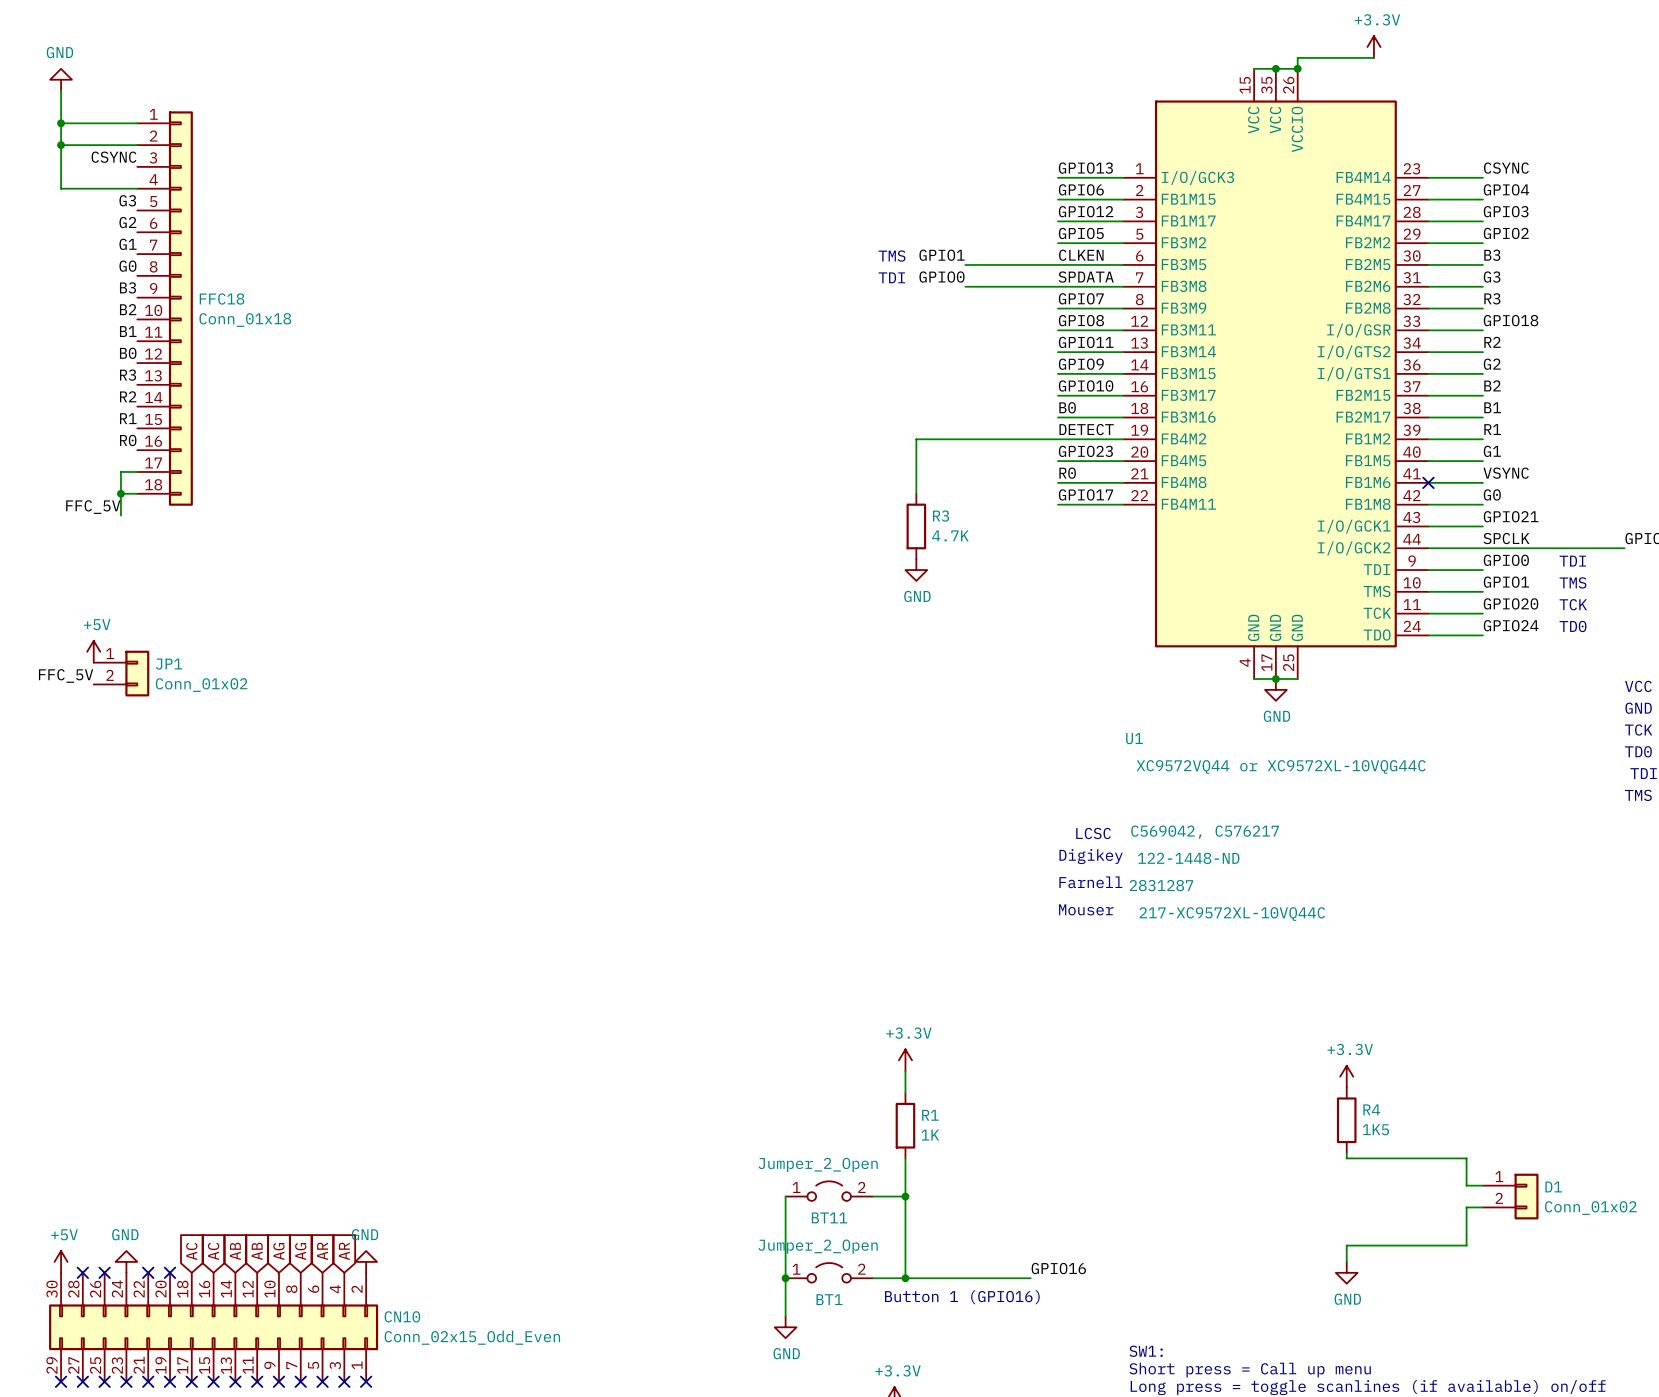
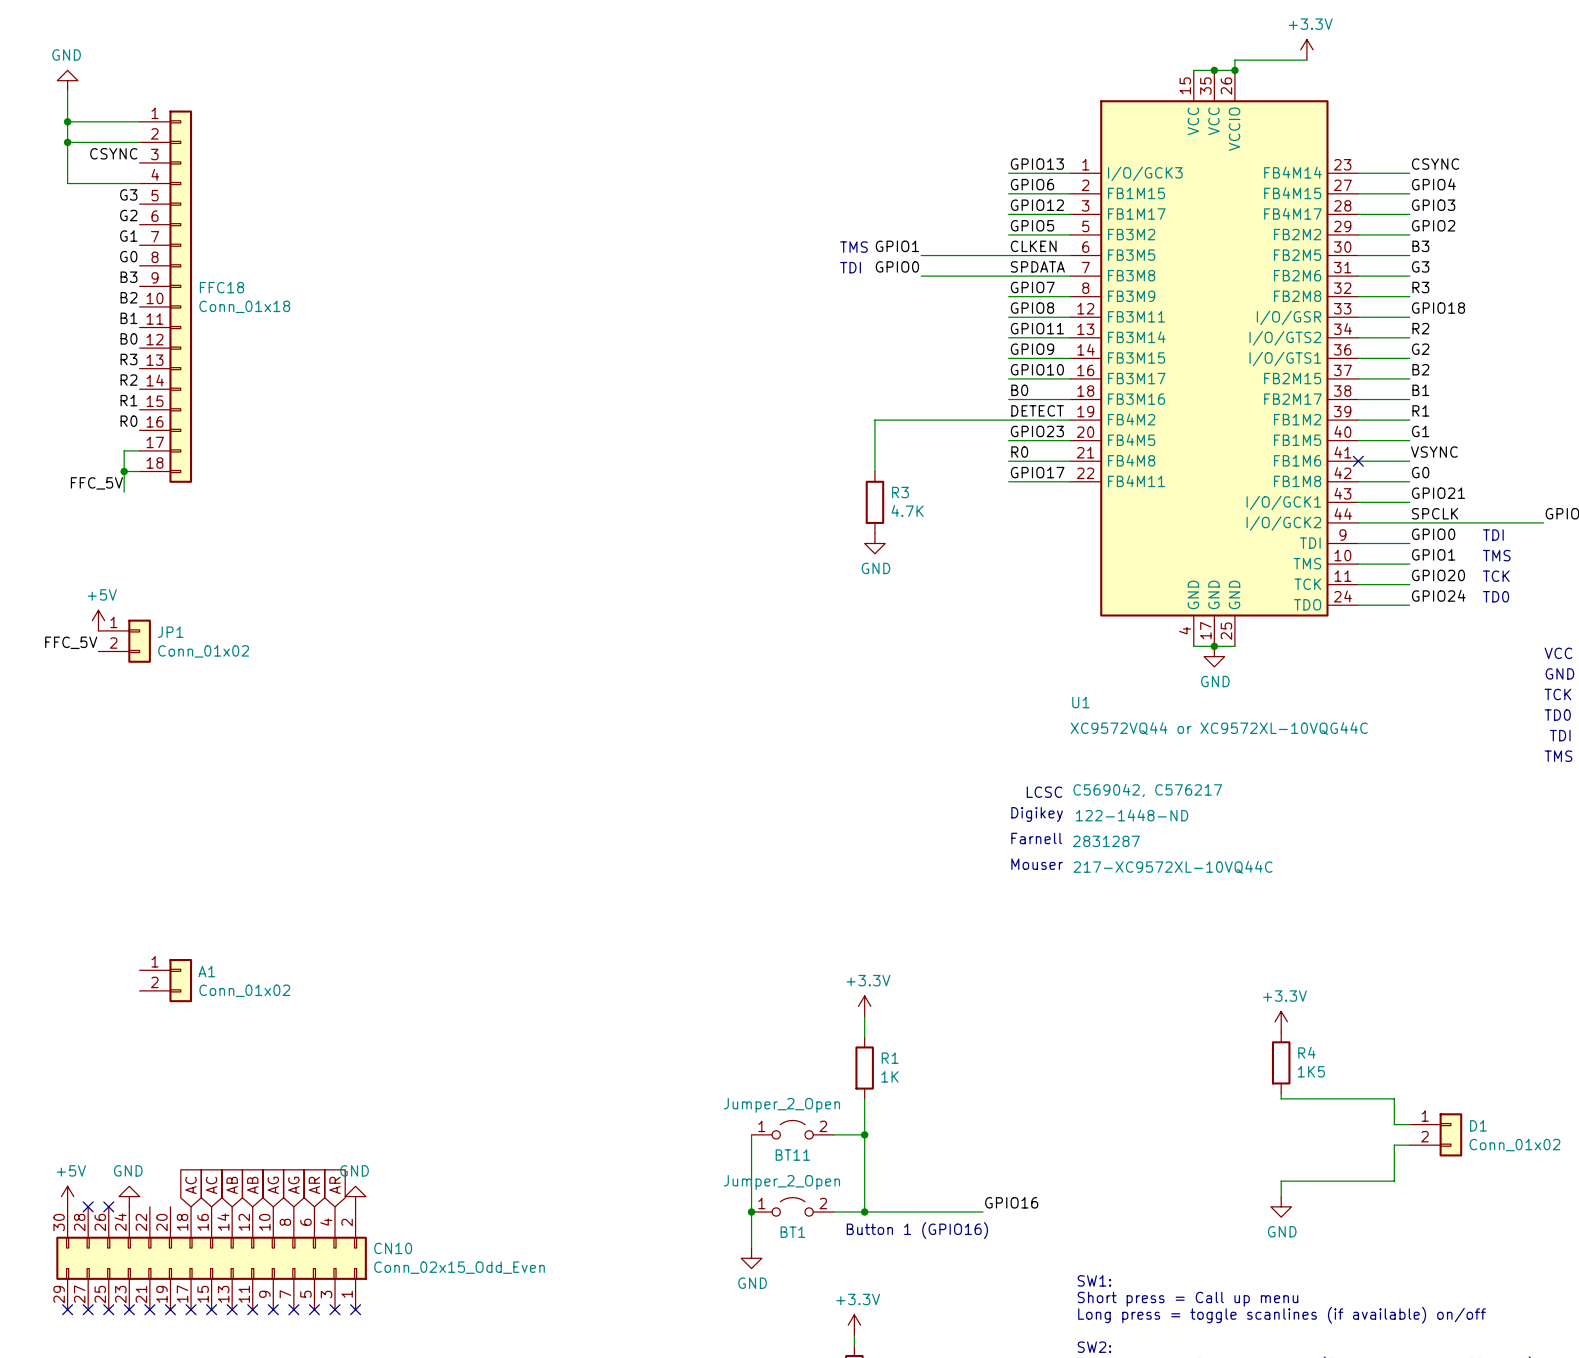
A1: none -> Conn_01x02 (165, 980)
no-connect mark: (148, 1272) -> none
no-connect mark: (170, 1272) -> none

